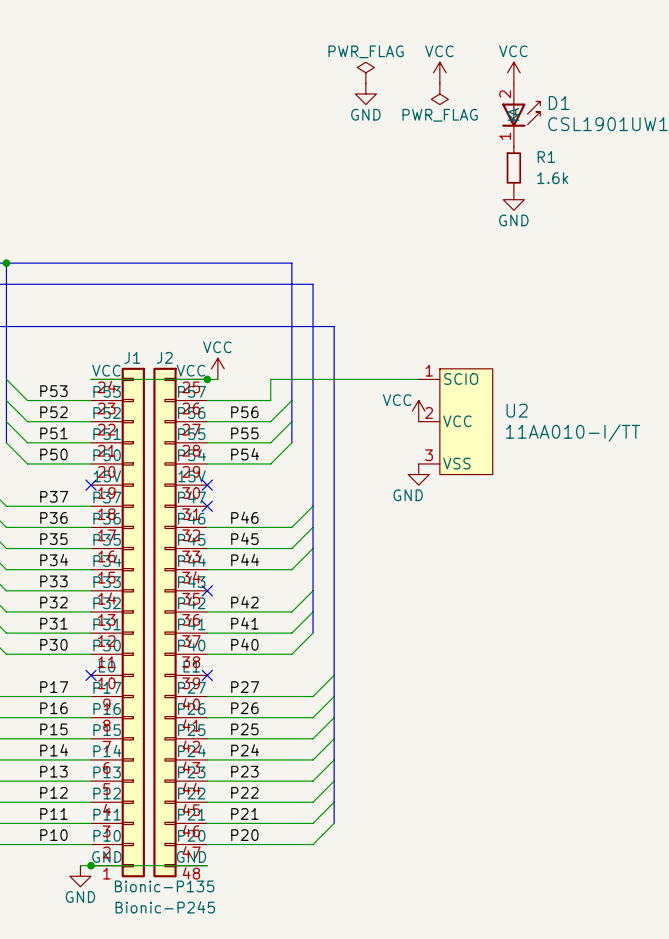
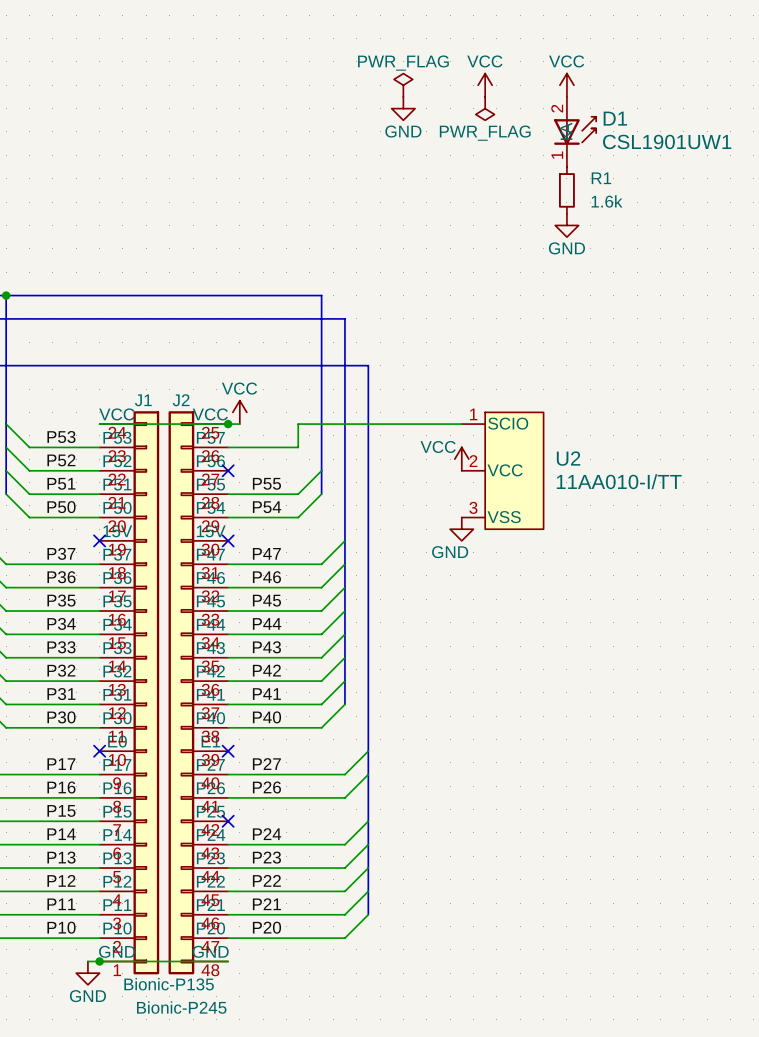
wire: (291, 400) (270, 421) (207, 421) -> none
label: P56 (244, 412) -> none
no-connect mark: none -> (228, 470)
wire: none -> (344, 540) (321, 564) (228, 564)
label: none -> P47 (266, 553)
no-connect mark: (207, 506) -> none
wire: none -> (344, 634) (321, 657) (228, 657)
label: none -> P43 (266, 647)
no-connect mark: (207, 590) -> none
wire: (334, 717) (313, 738) (207, 738) -> none
label: P25 (244, 729) -> none
no-connect mark: none -> (228, 821)

